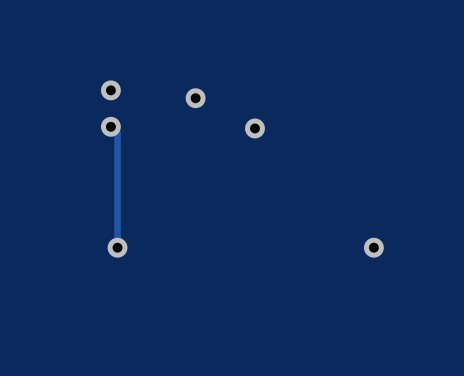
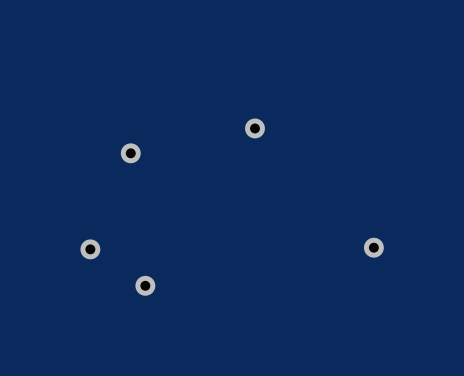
via: (110, 90) -> none
via: (195, 98) -> none
track: (110, 126) (117, 133) (117, 247) -> none
via: (110, 126) -> none
via: none -> (130, 153)
via: (117, 247) -> none
via: none -> (90, 249)
via: none -> (145, 285)

